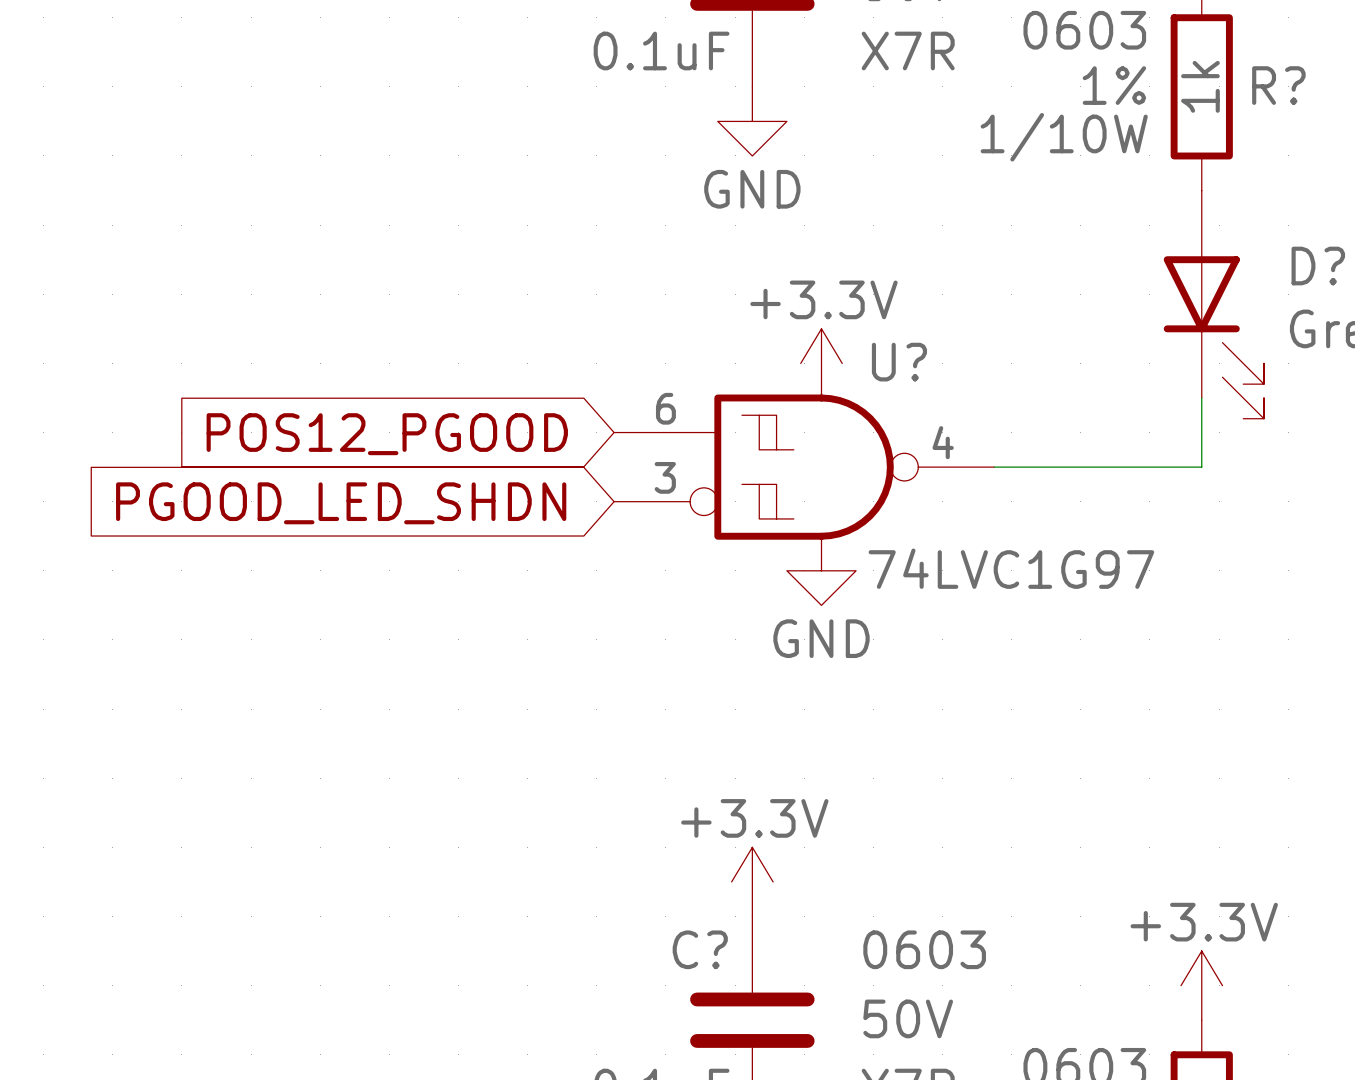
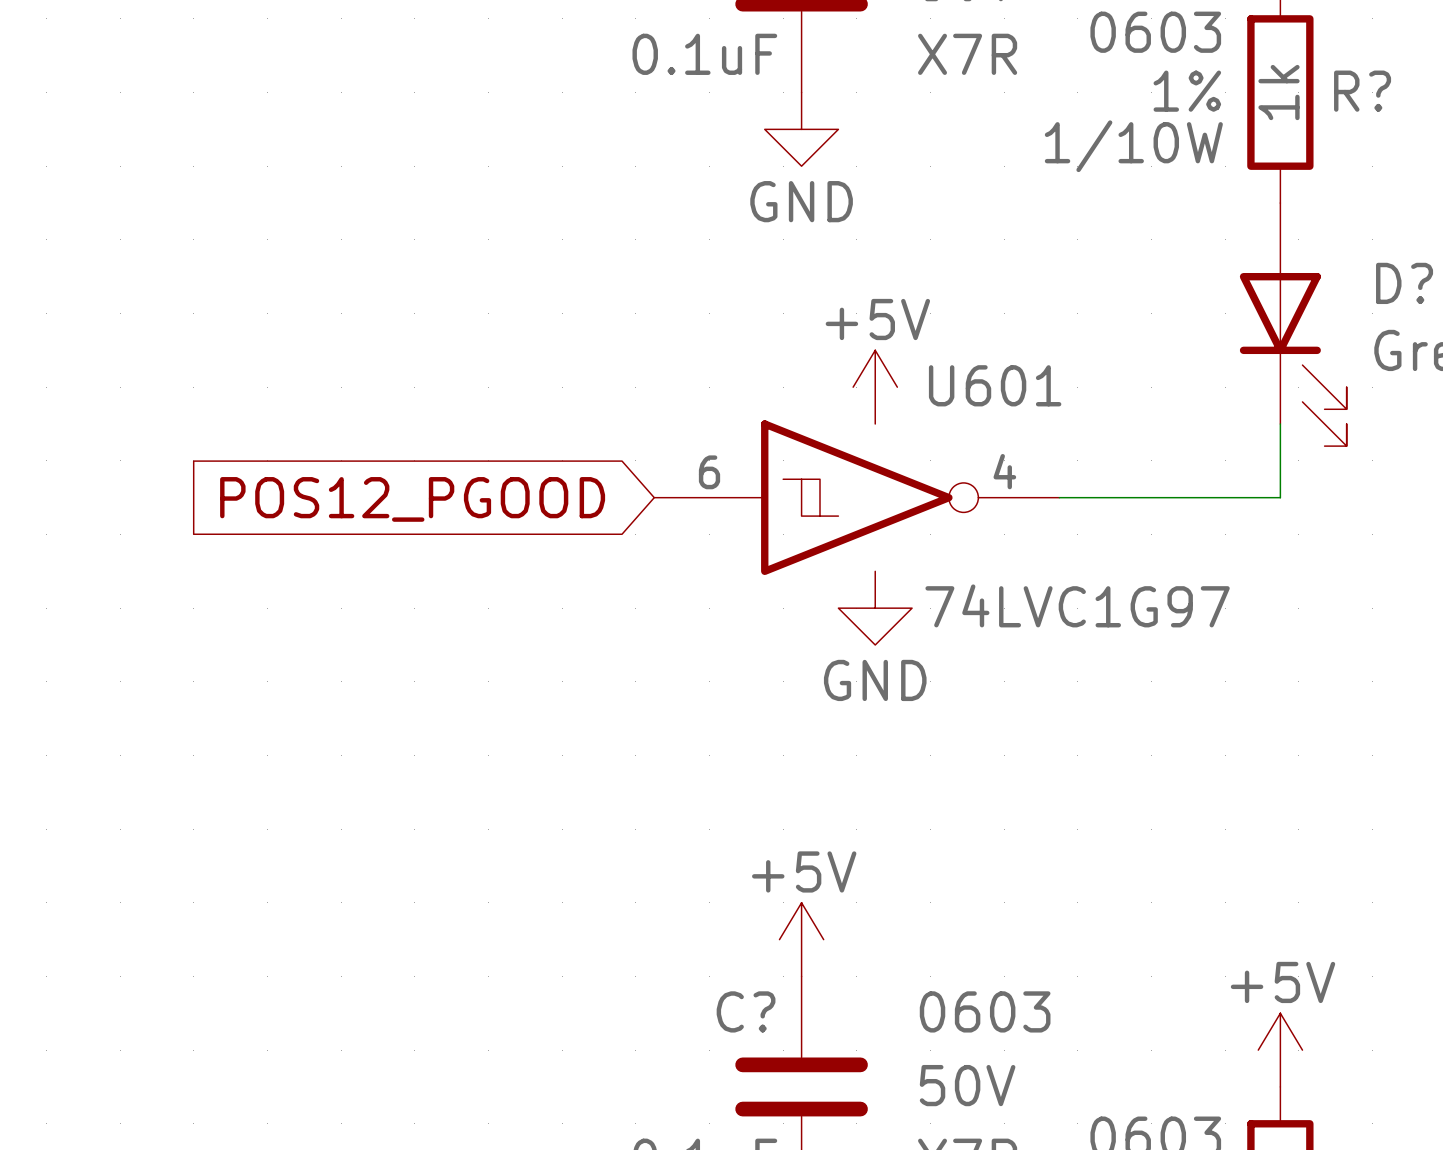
power symbol: +3.3V (821, 363) -> +5V (875, 387)
global label position: POS12_PGOOD (387, 434) -> POS12_PGOOD (412, 499)
U?: 74LVC1G97 (804, 467) -> none
U601: none -> 74LVC1G97 (856, 497)
global label: PGOOD_LED_SHDN (341, 503) -> none
power symbol: +3.3V (752, 881) -> +5V (801, 939)
power symbol: +3.3V (1201, 985) -> +5V (1280, 1050)

